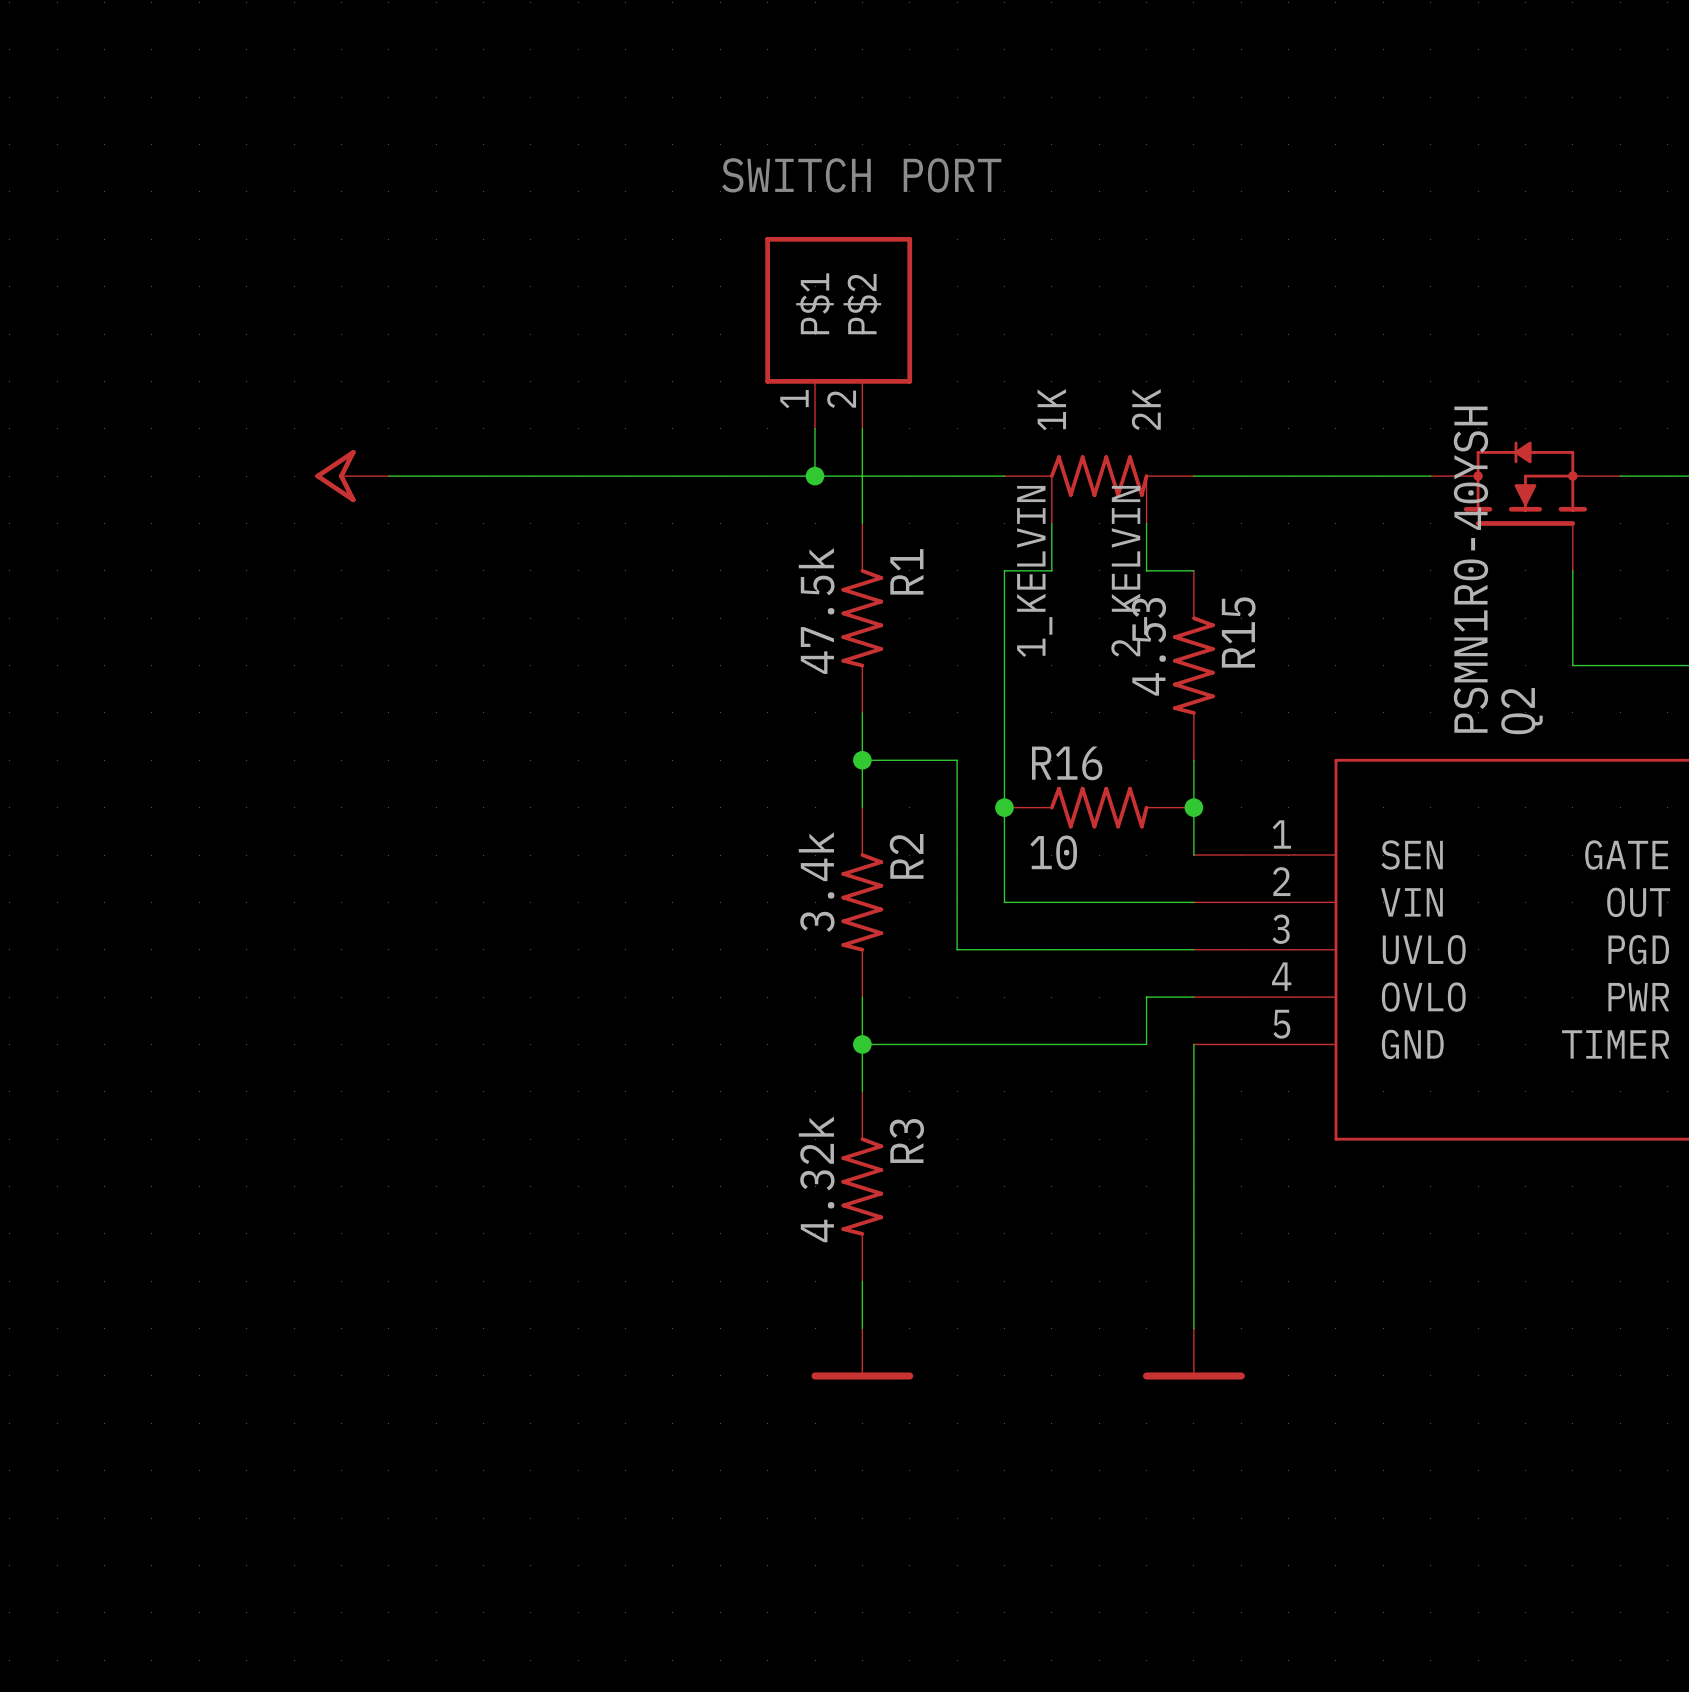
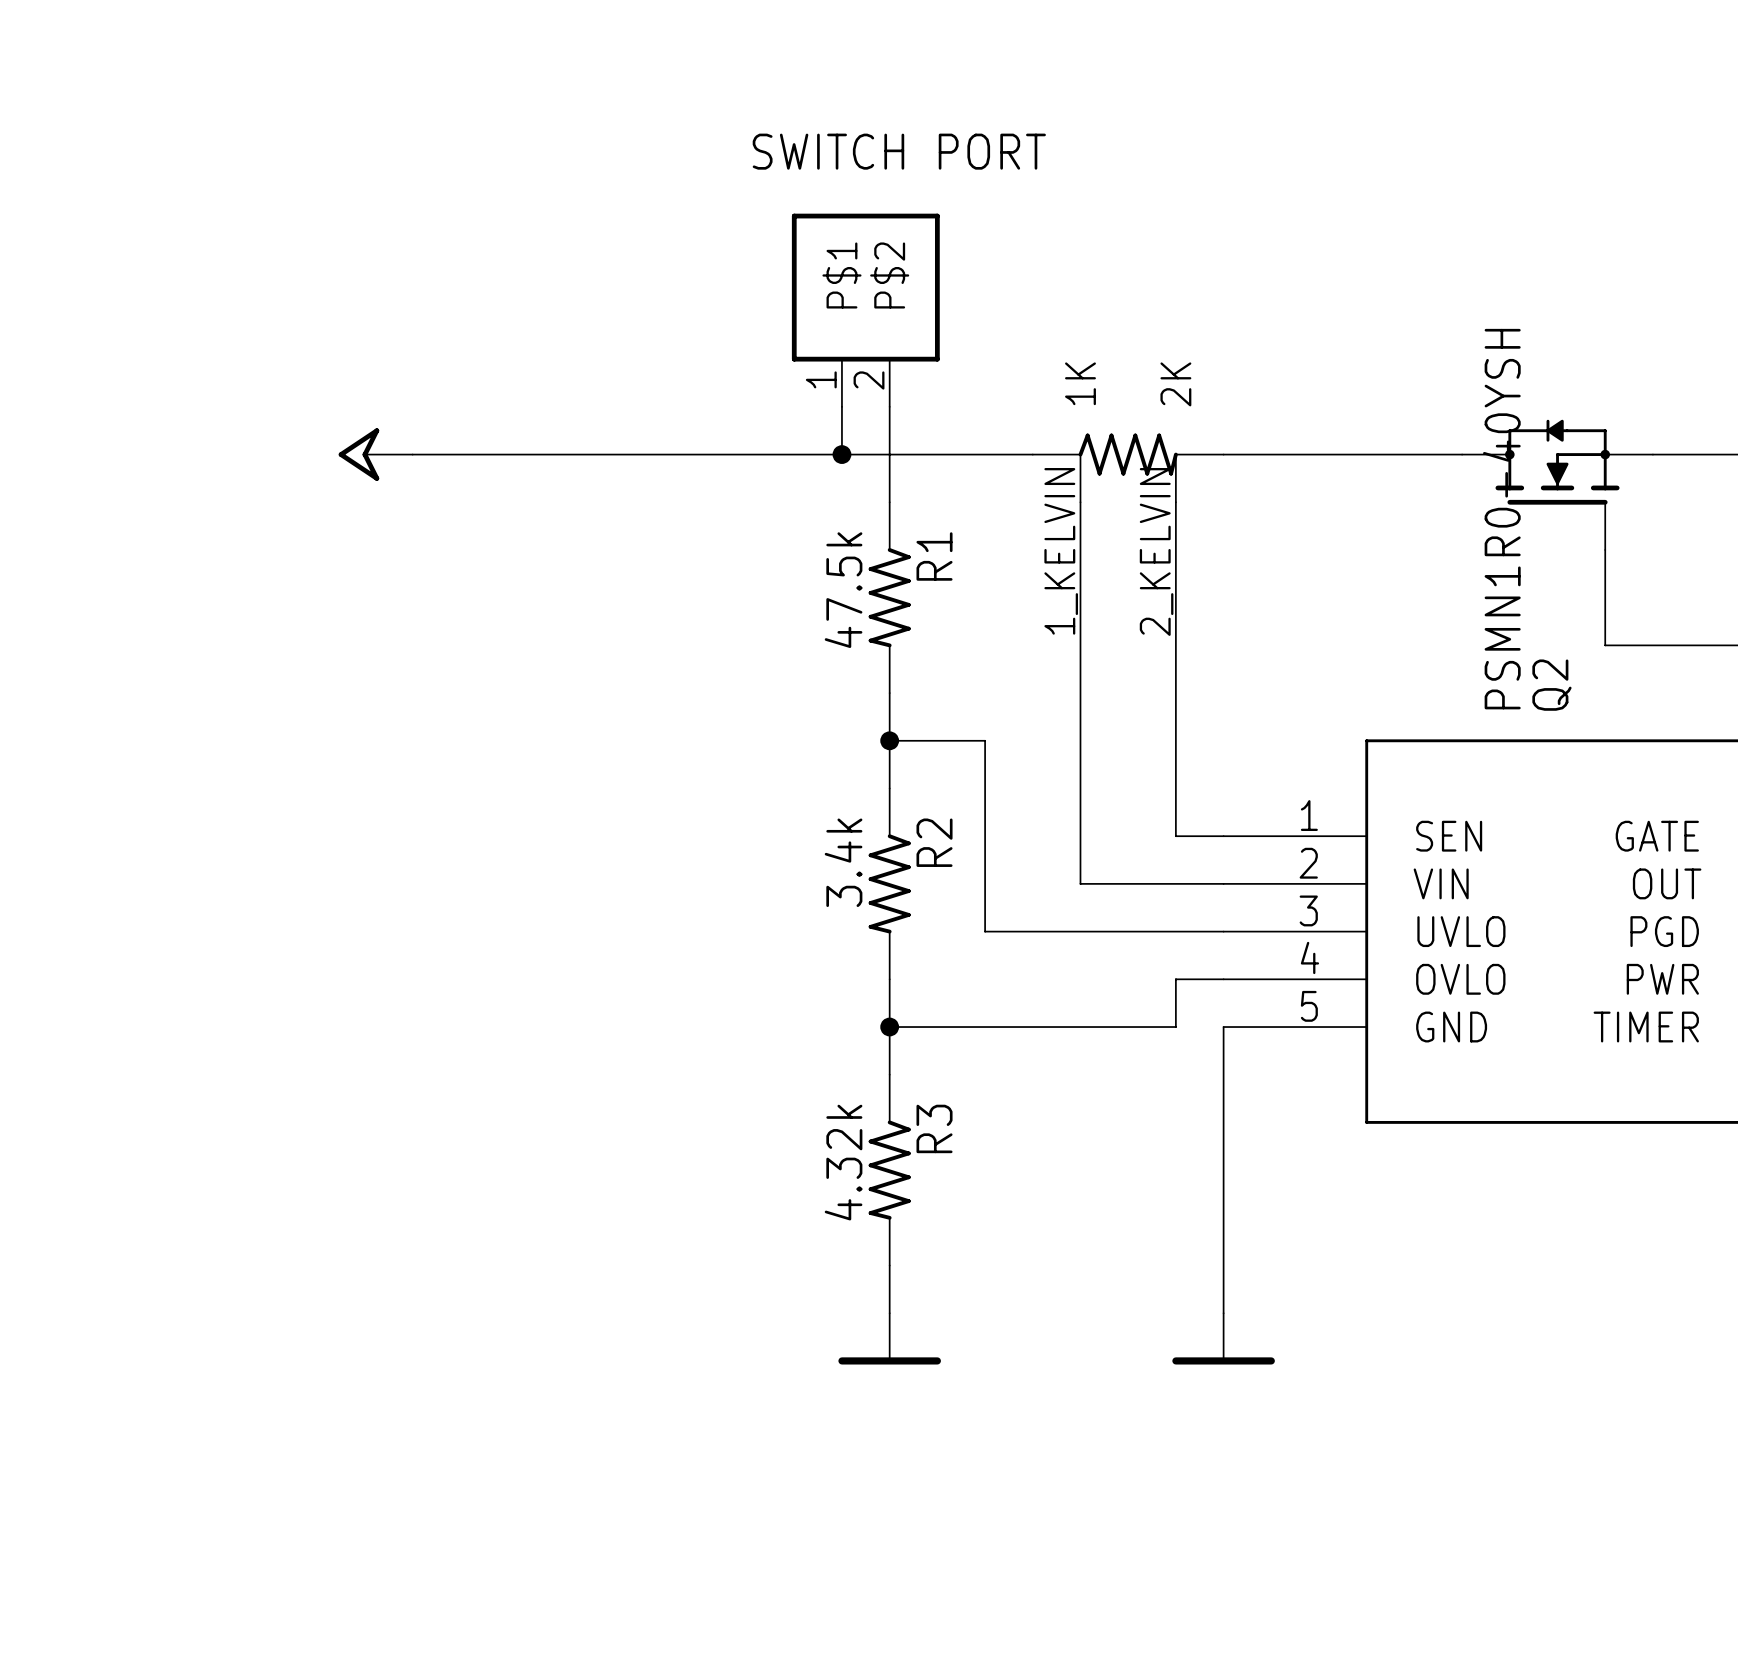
wire: (1051, 570) (1004, 570) (1004, 902) (1051, 902) -> (1080, 549) (1080, 883)
wire: (1146, 570) (1193, 570) -> none
R15: 4.53 (1193, 665) -> none
wire: (1193, 760) (1193, 855) -> (1175, 549) (1175, 836) (1223, 836)
junction: (1004, 807) -> none
R16: 10 (1099, 807) -> none
junction: (1193, 807) -> none

